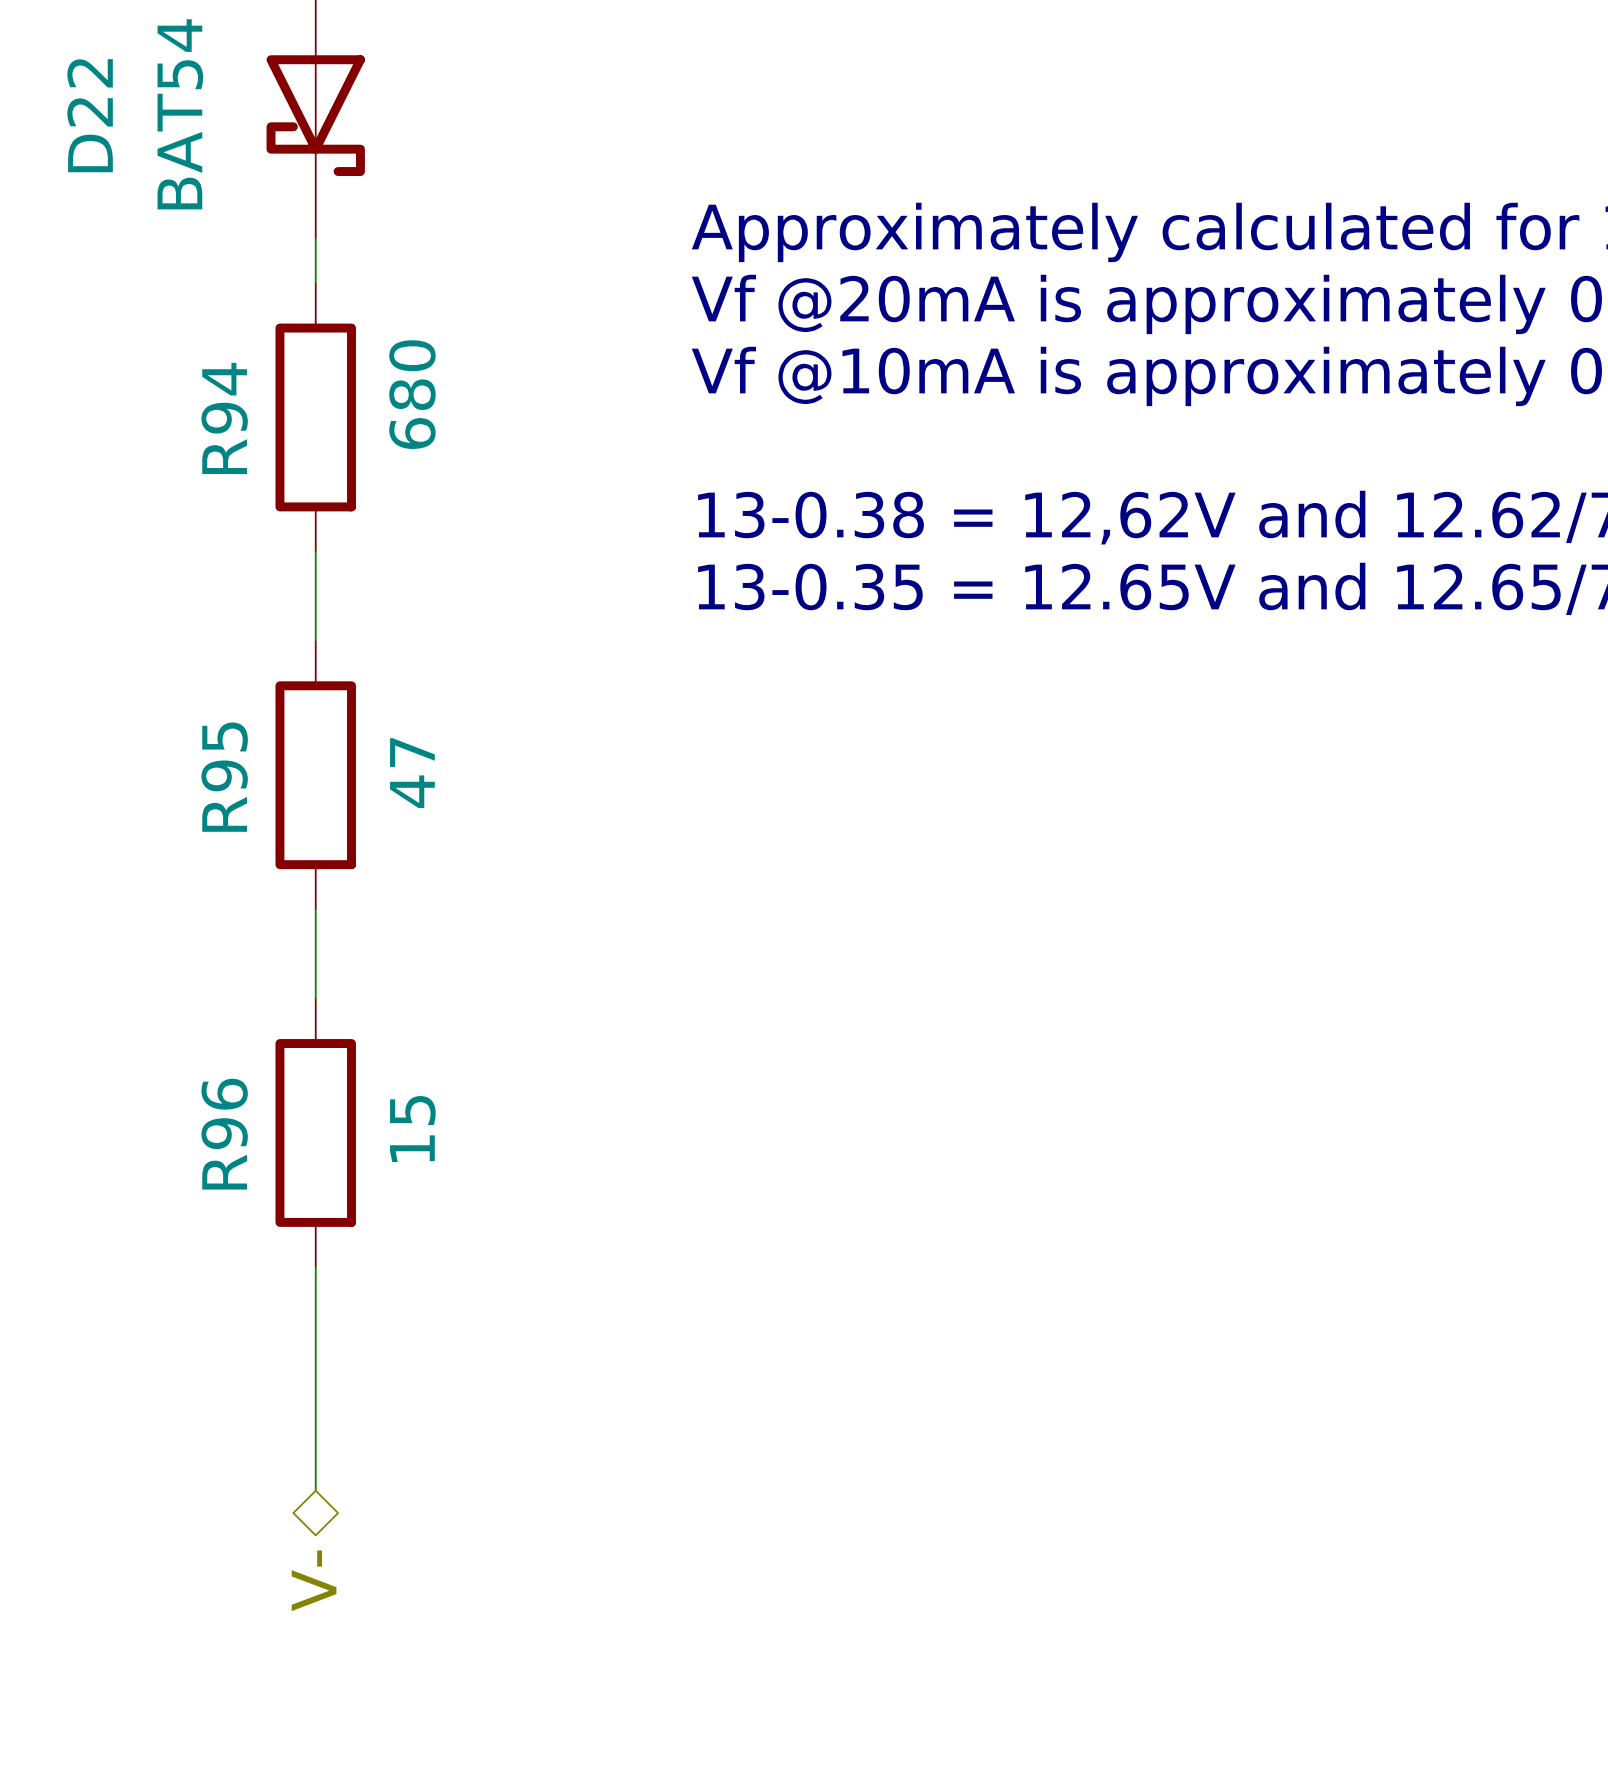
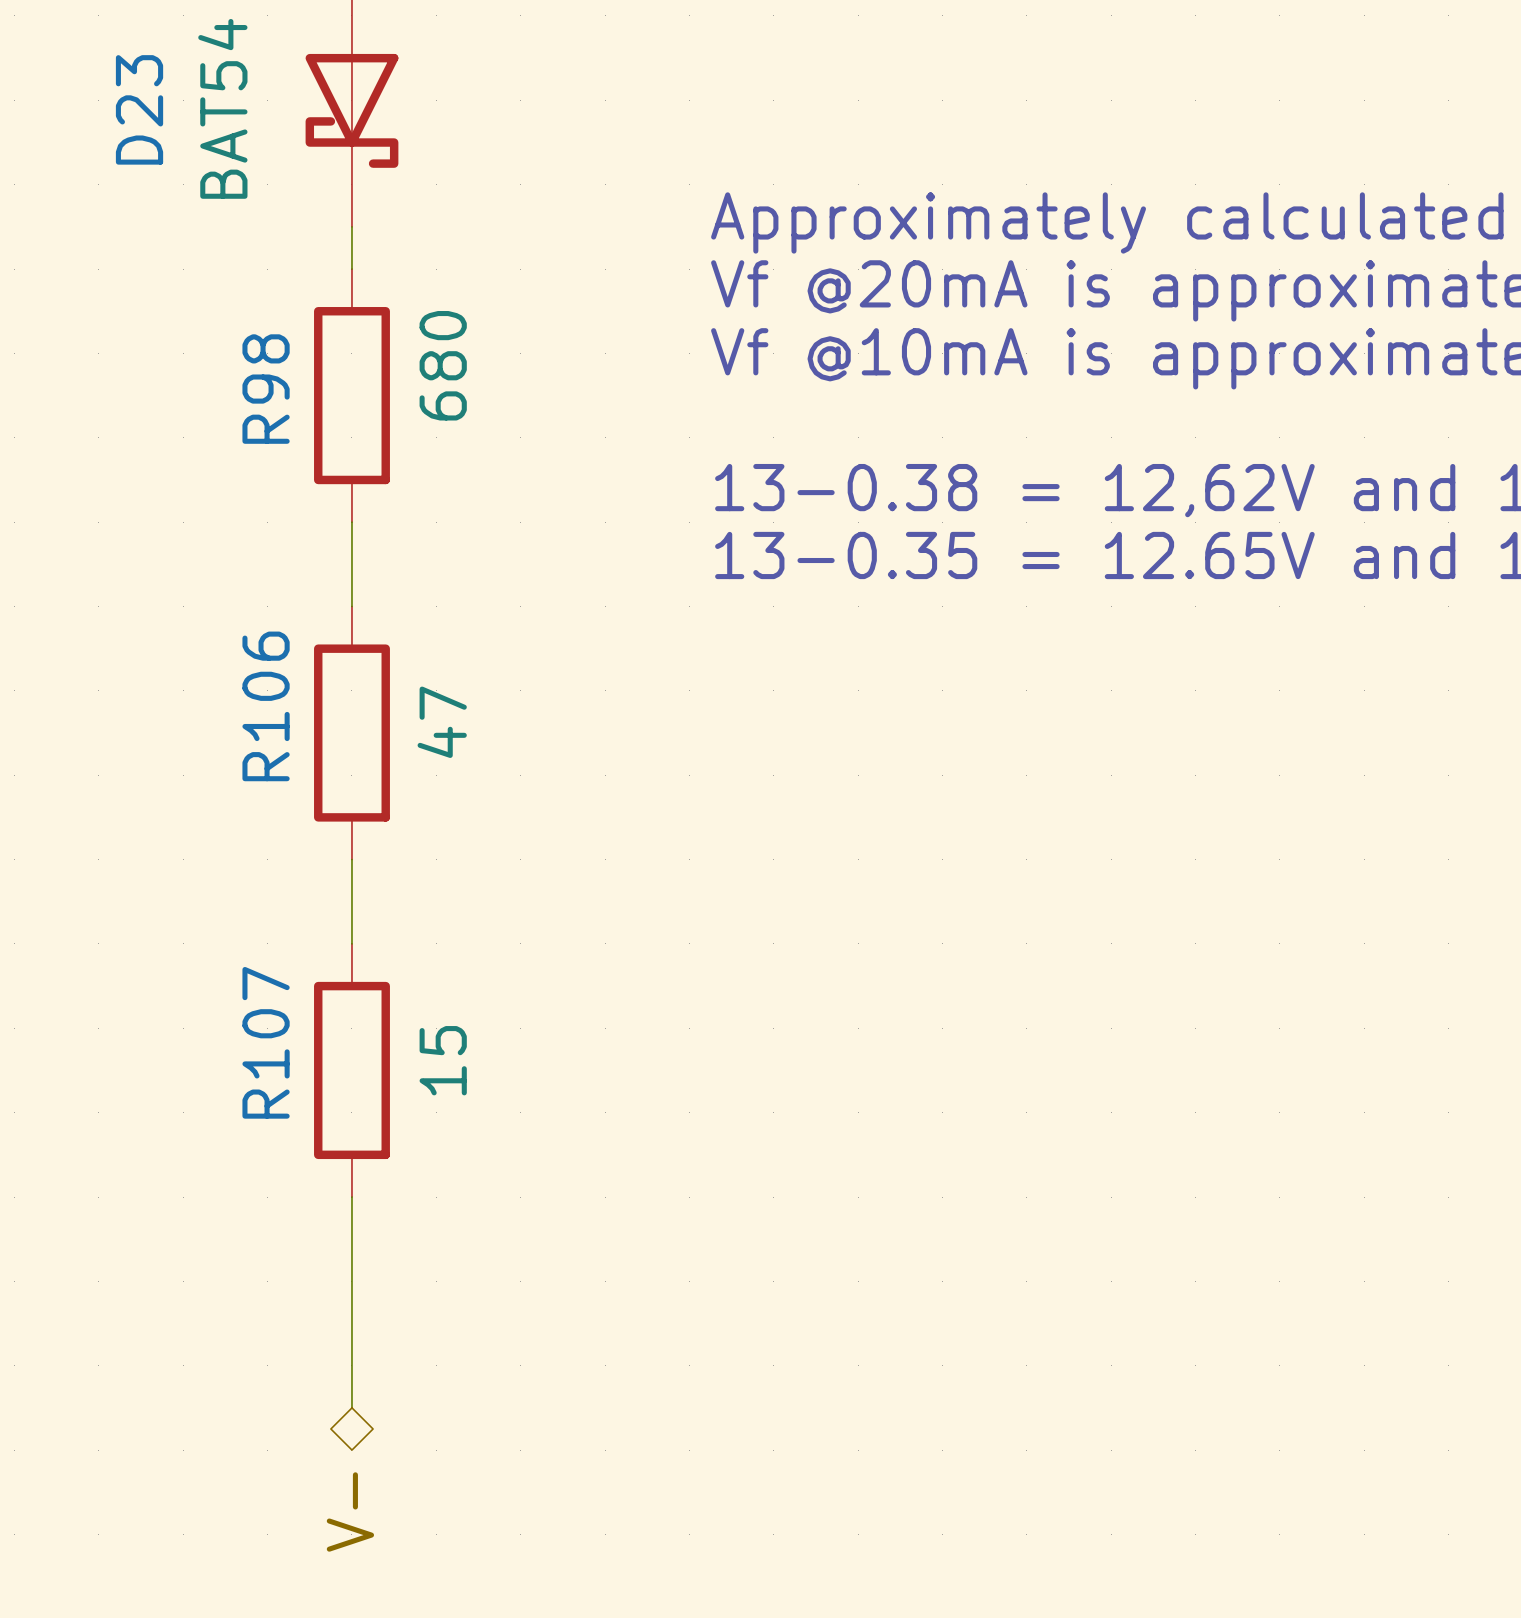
D22 name: D22 (90, 115) -> D23 (139, 109)
R94 name: R94 (224, 418) -> R98 (266, 389)
R95 name: R95 (224, 777) -> R106 (266, 706)
R96 name: R96 (224, 1134) -> R107 (266, 1042)

